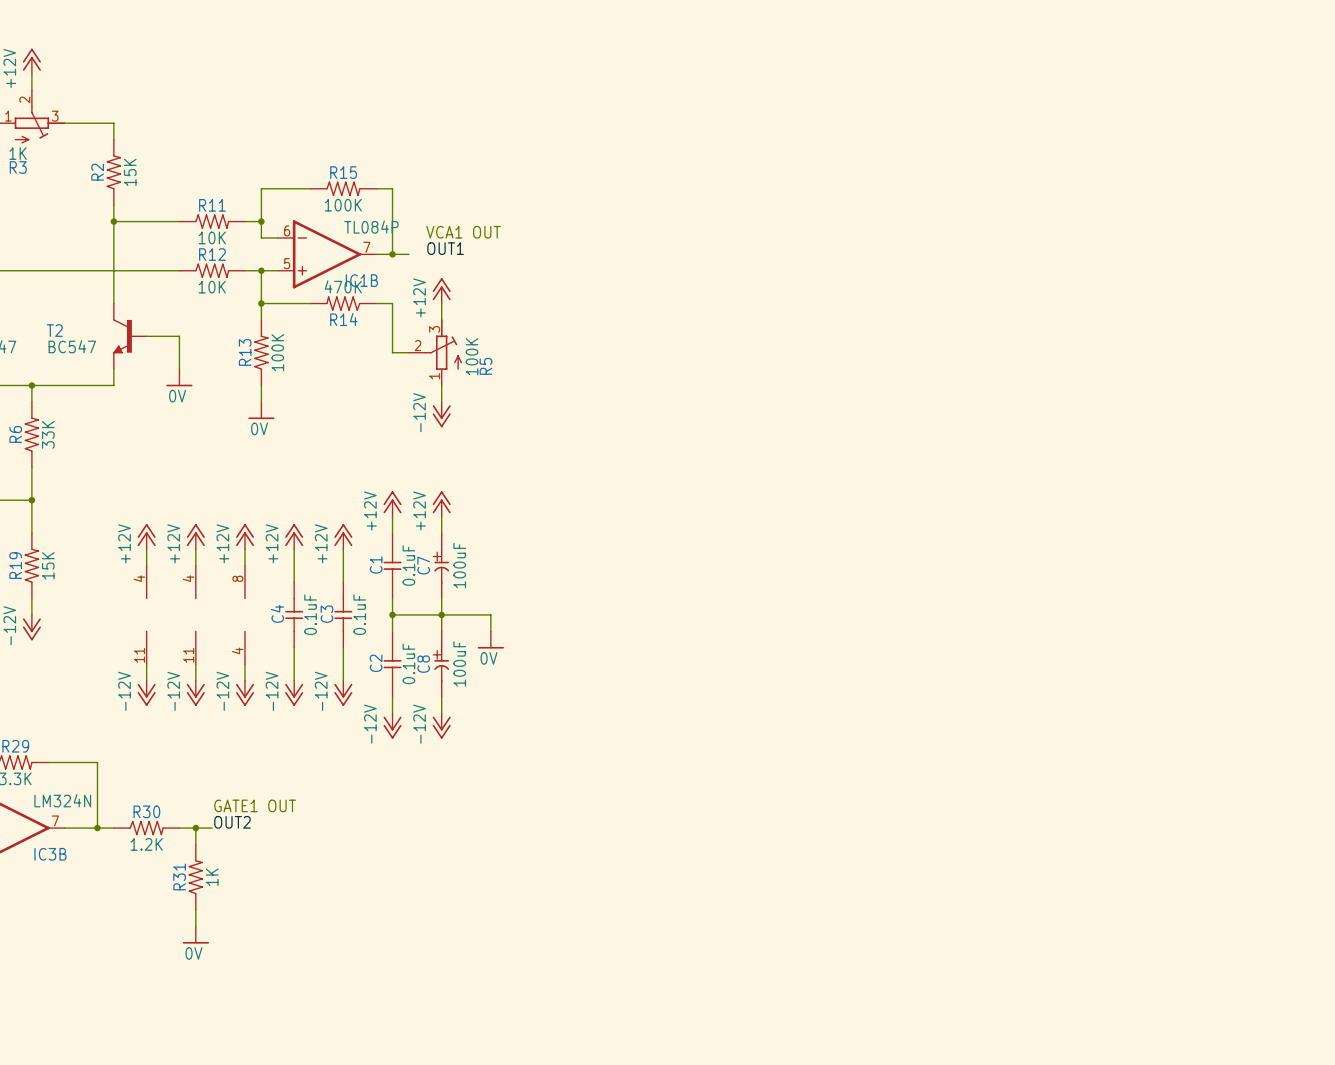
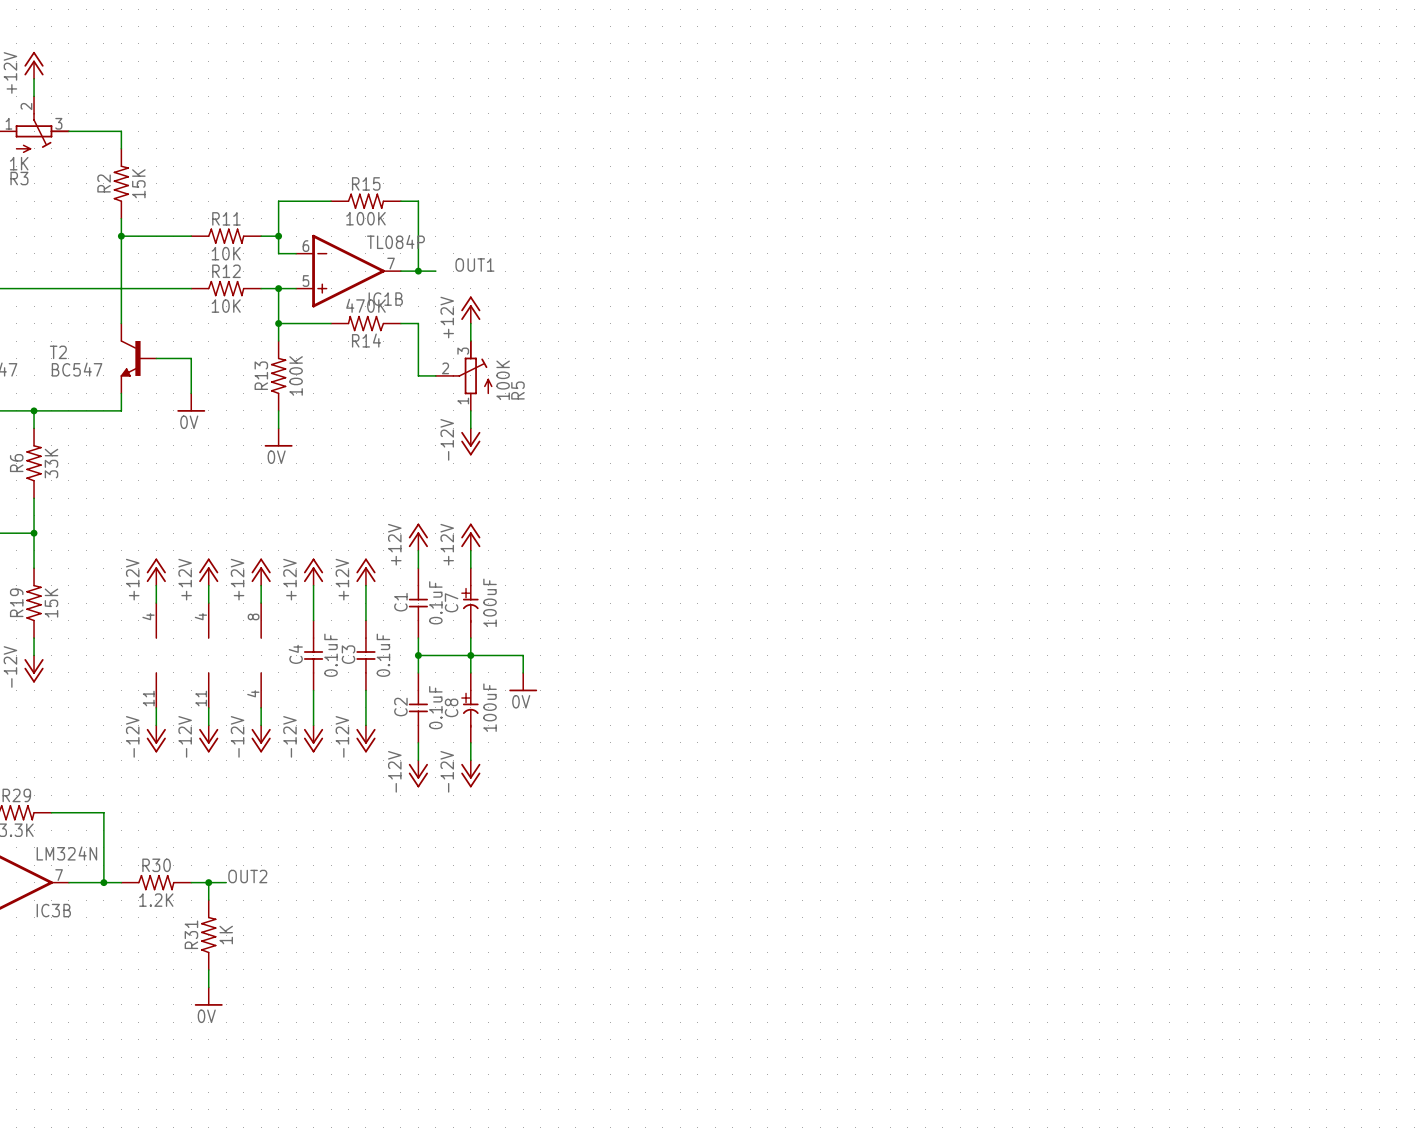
text: VCA1 OUT (463, 232) -> none
text: GATE1 OUT (255, 805) -> none

